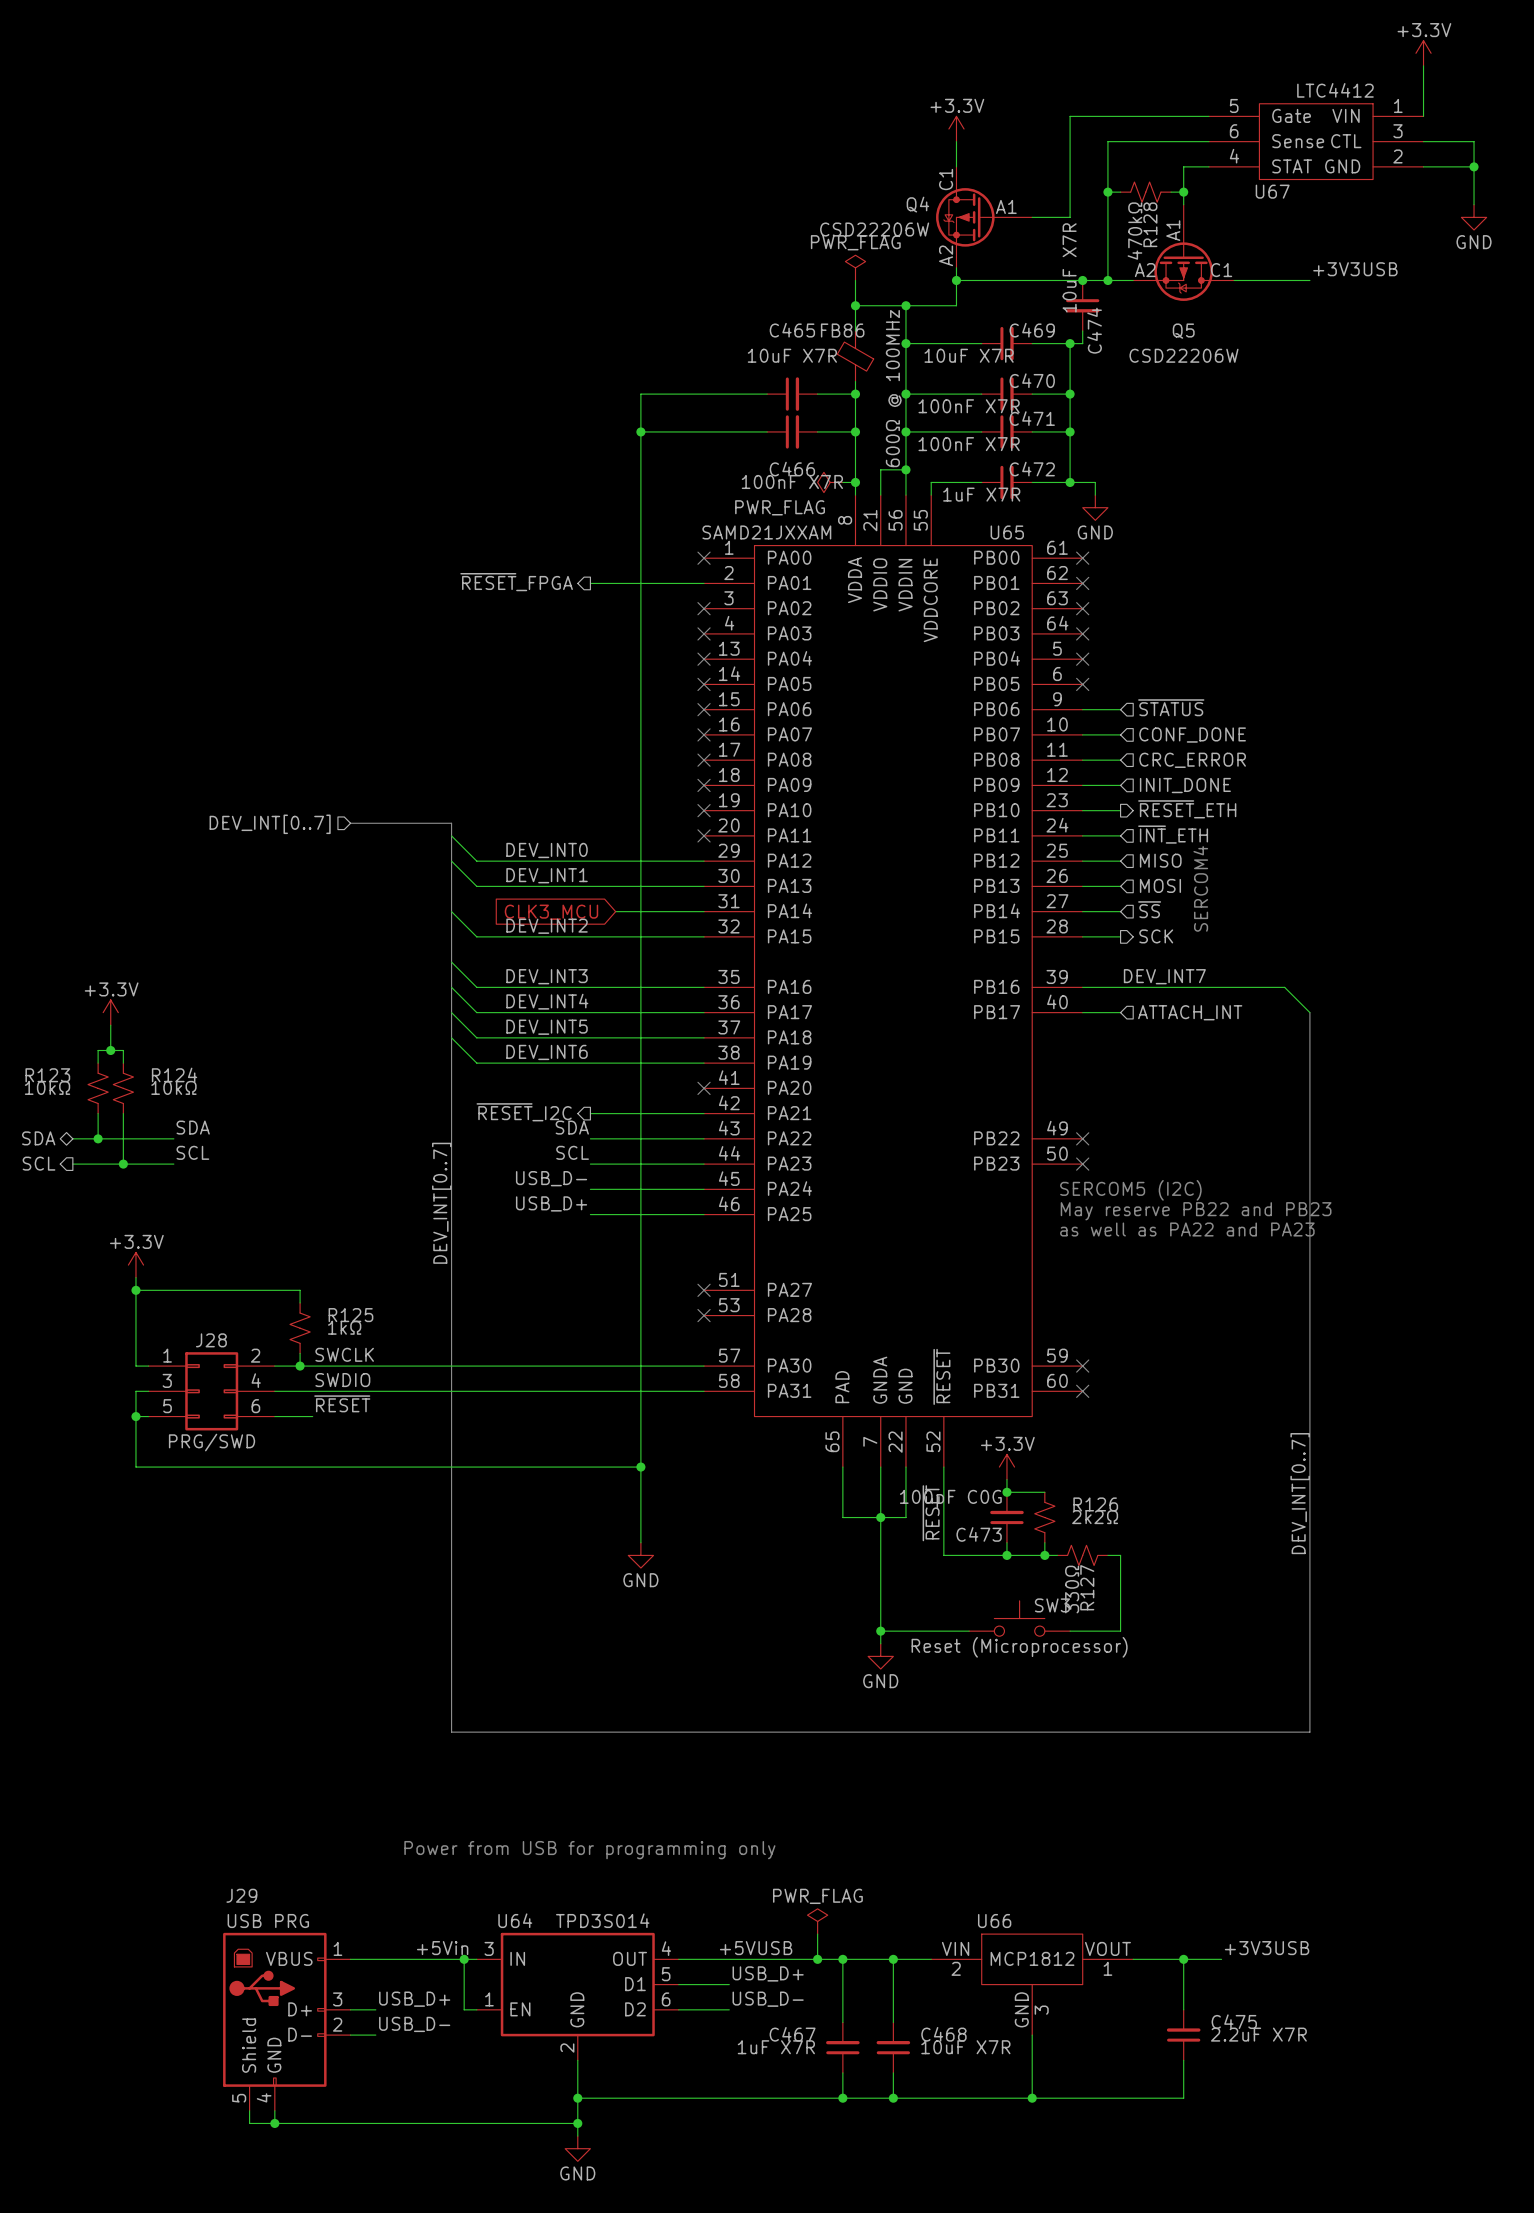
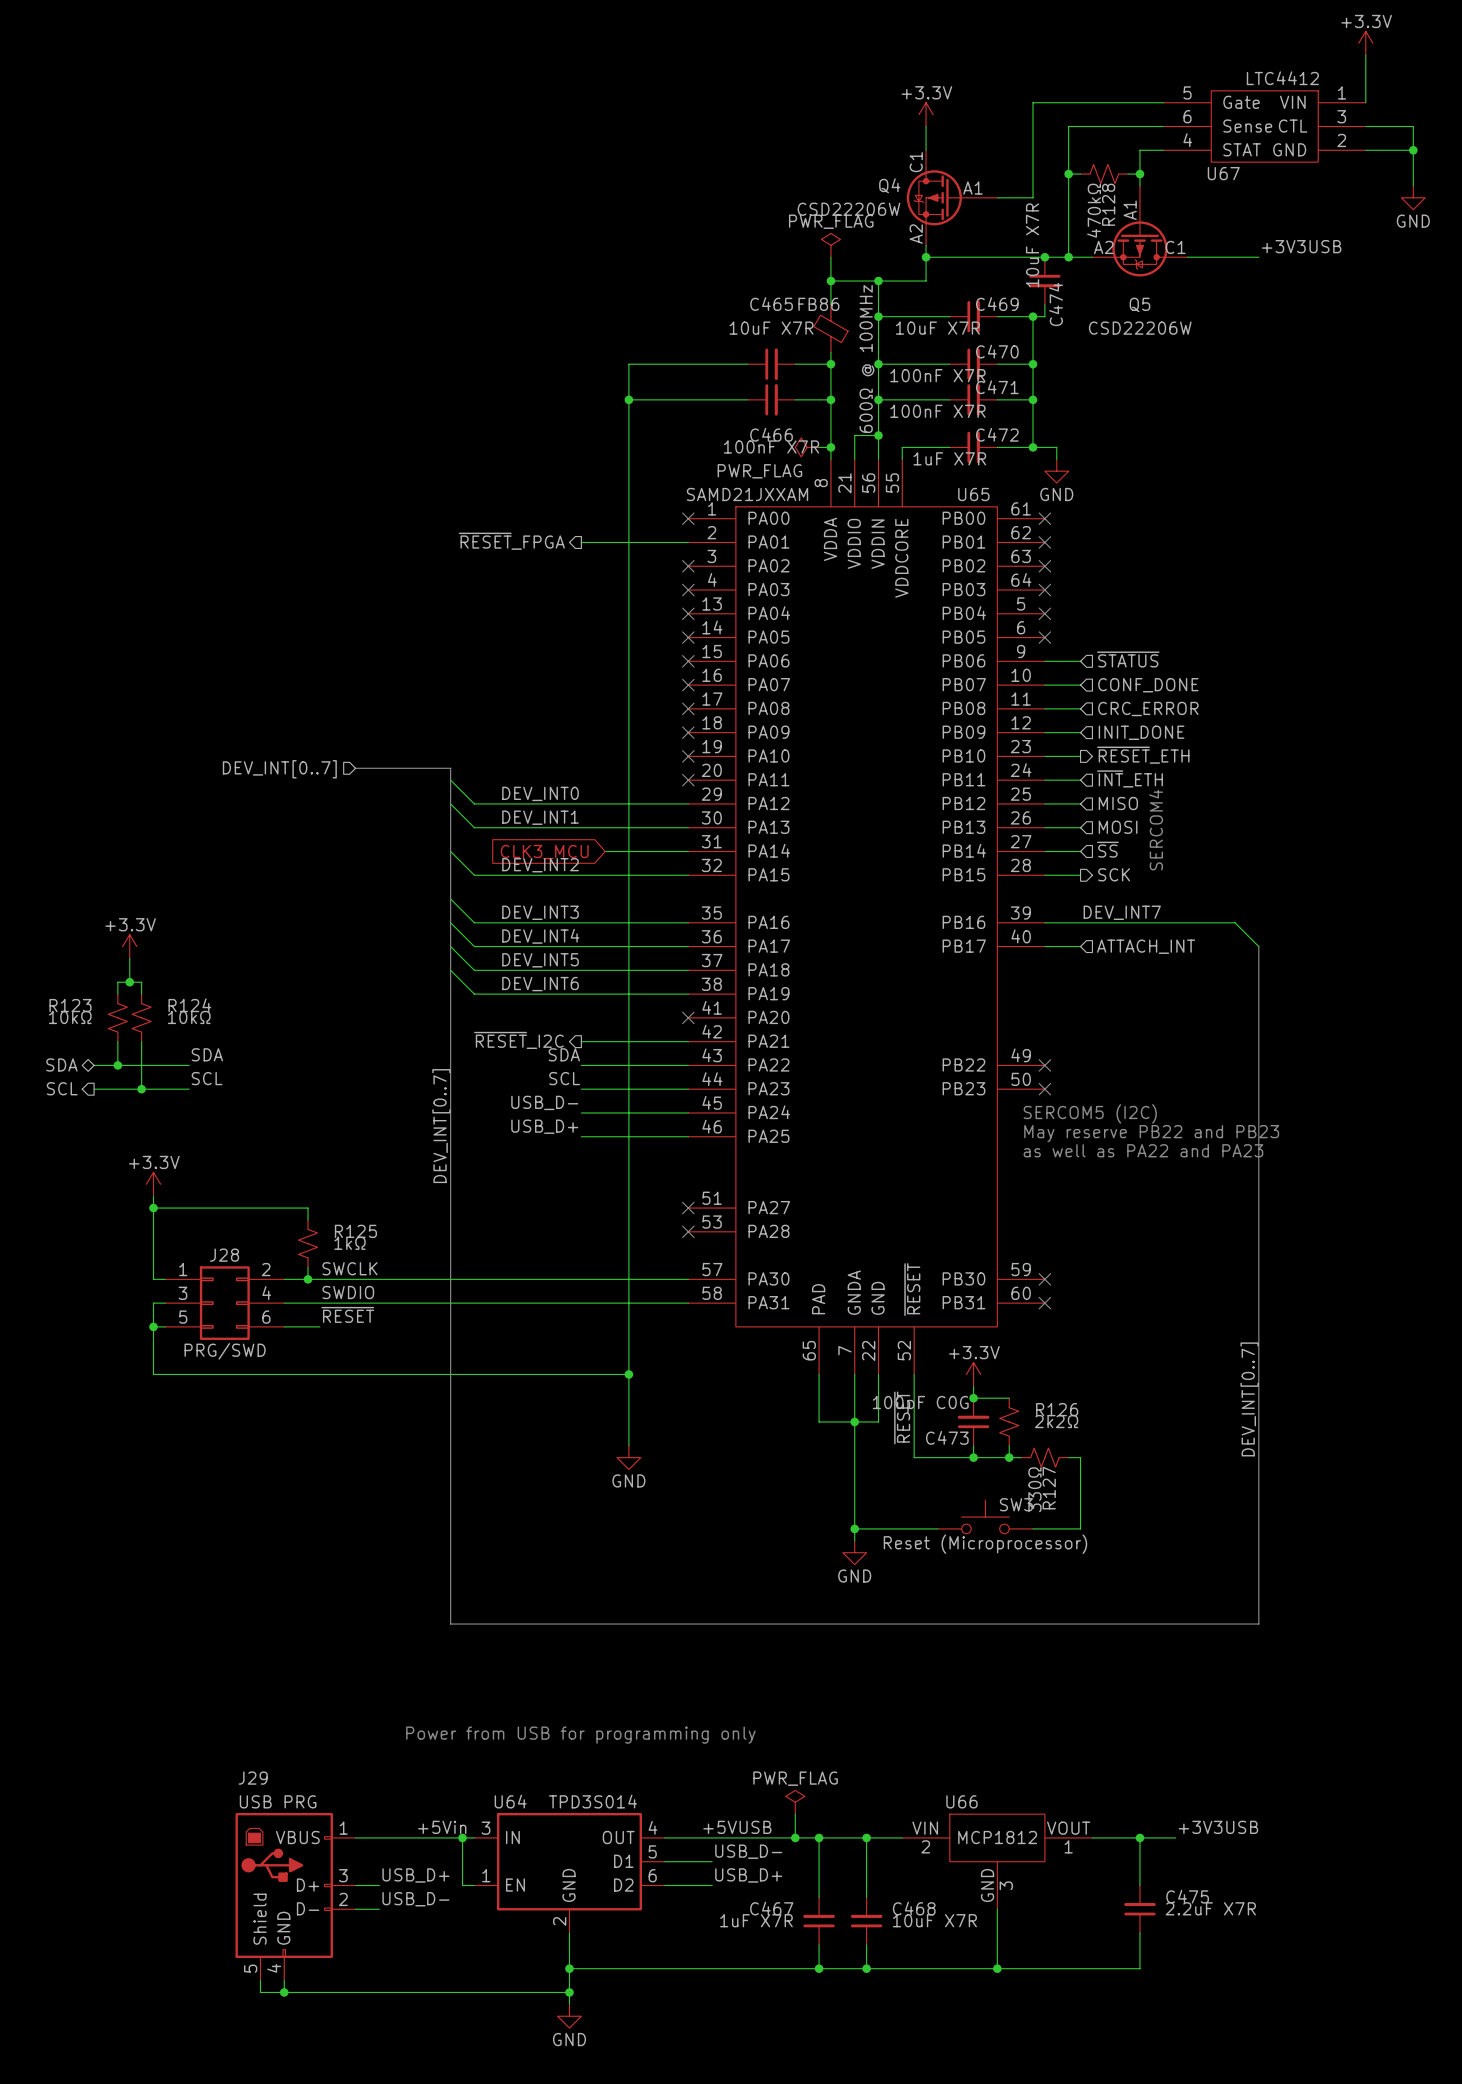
label: USB_D+ (768, 1973) -> USB_D- (748, 1851)
label: USB_D- (768, 1999) -> USB_D+ (748, 1875)

